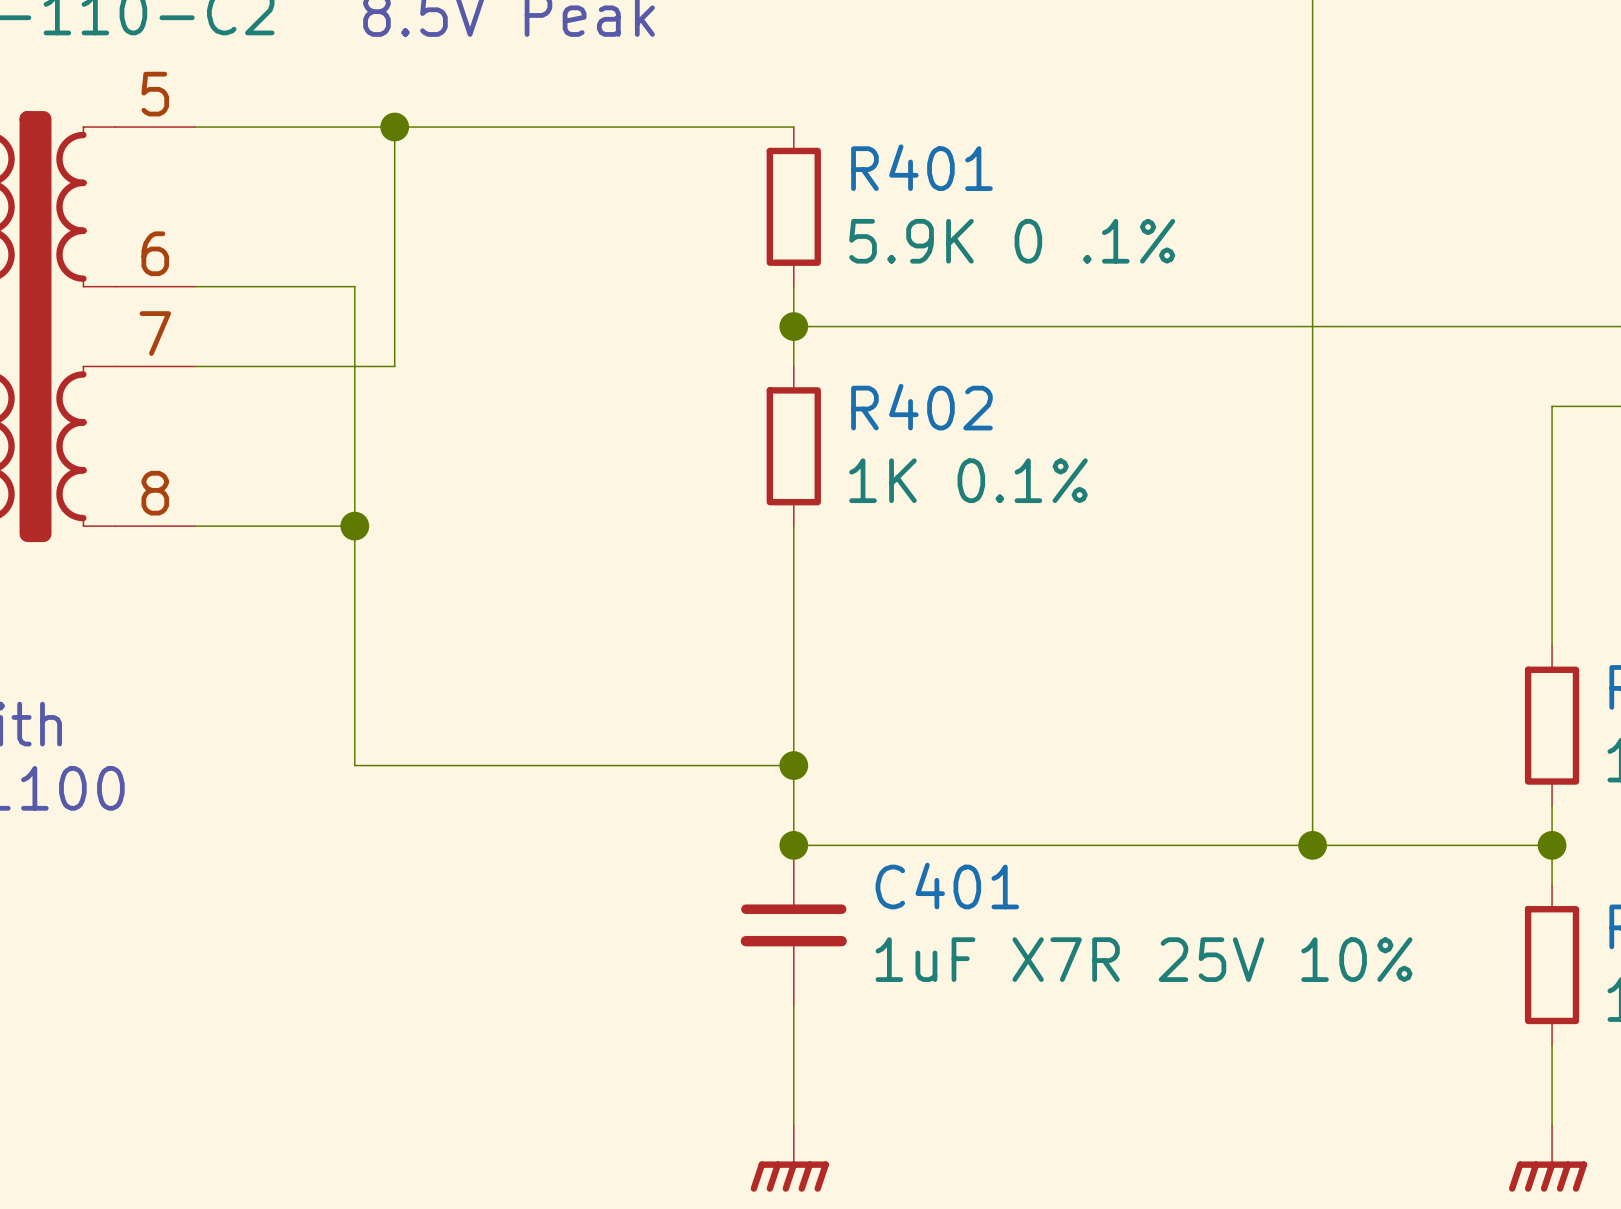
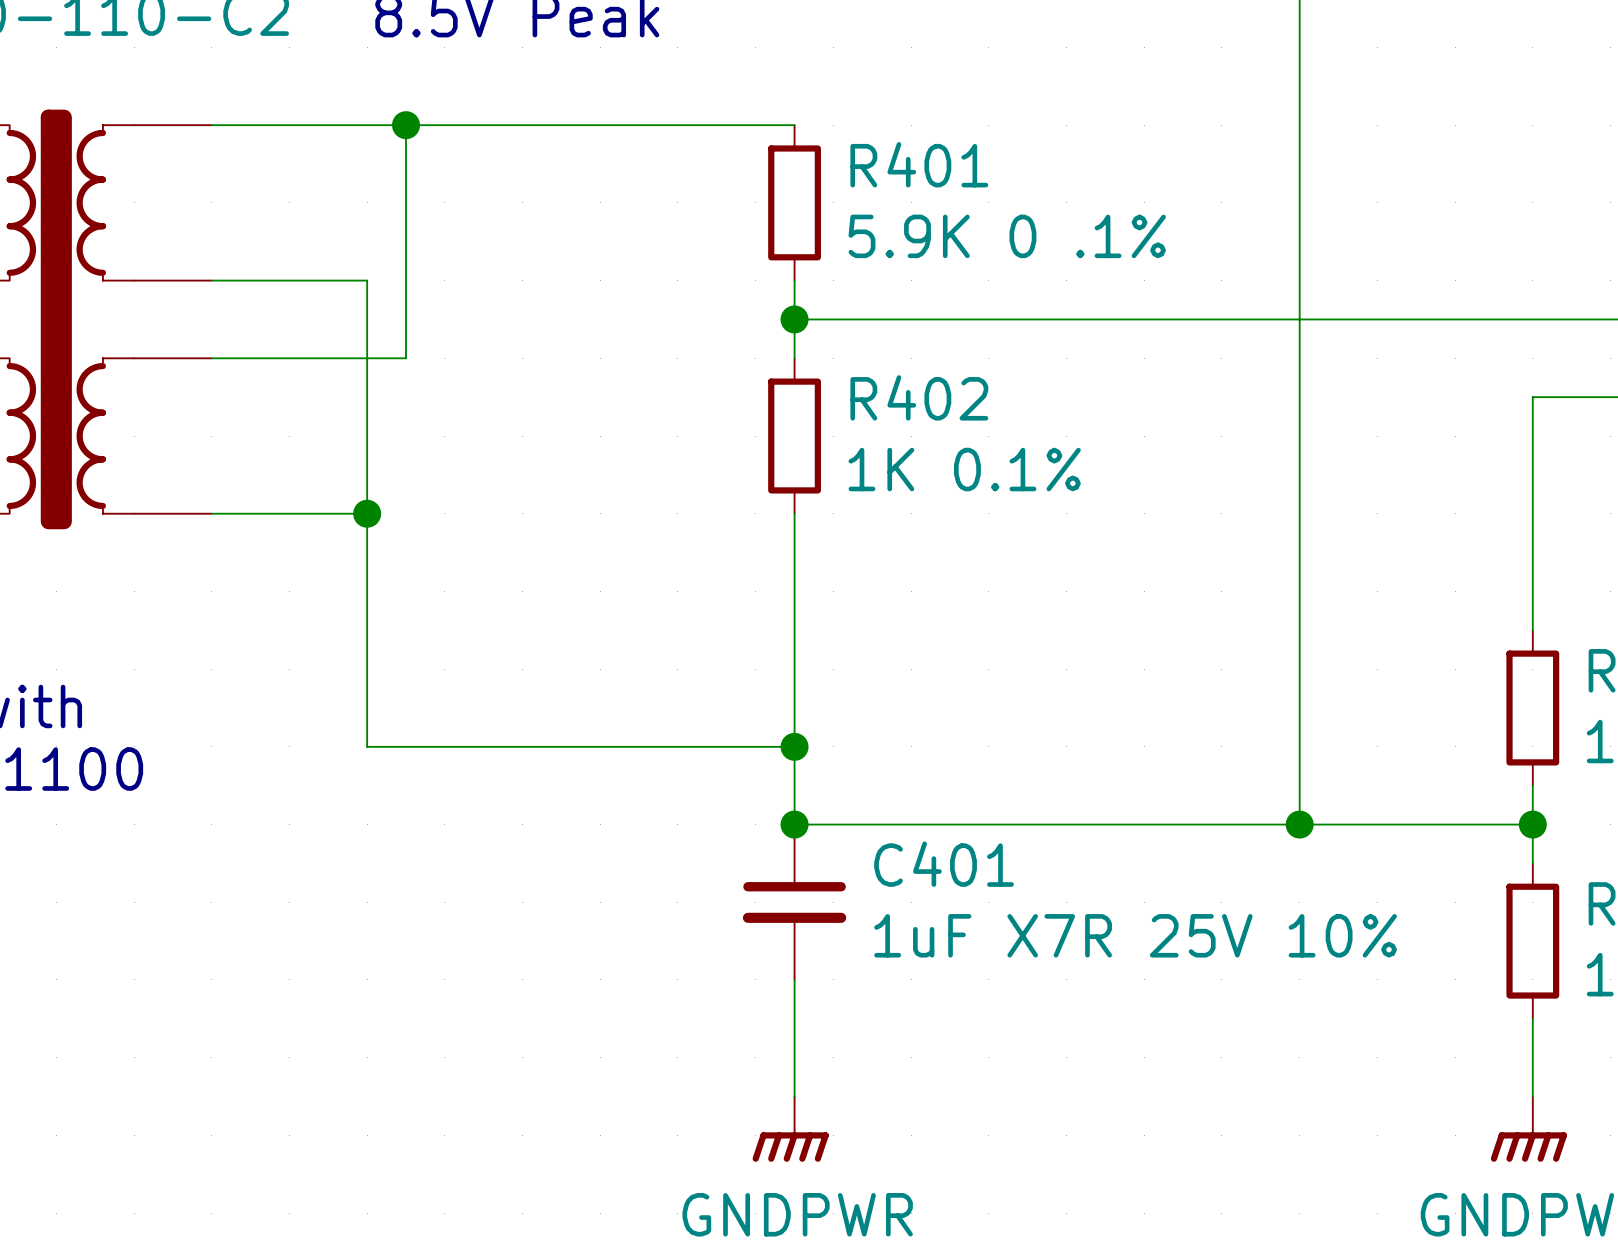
part pin number: 5 (155, 94) -> none
part pin number: 6 (155, 253) -> none
part pin number: 7 (155, 333) -> none
part pin number: 8 (155, 493) -> none

